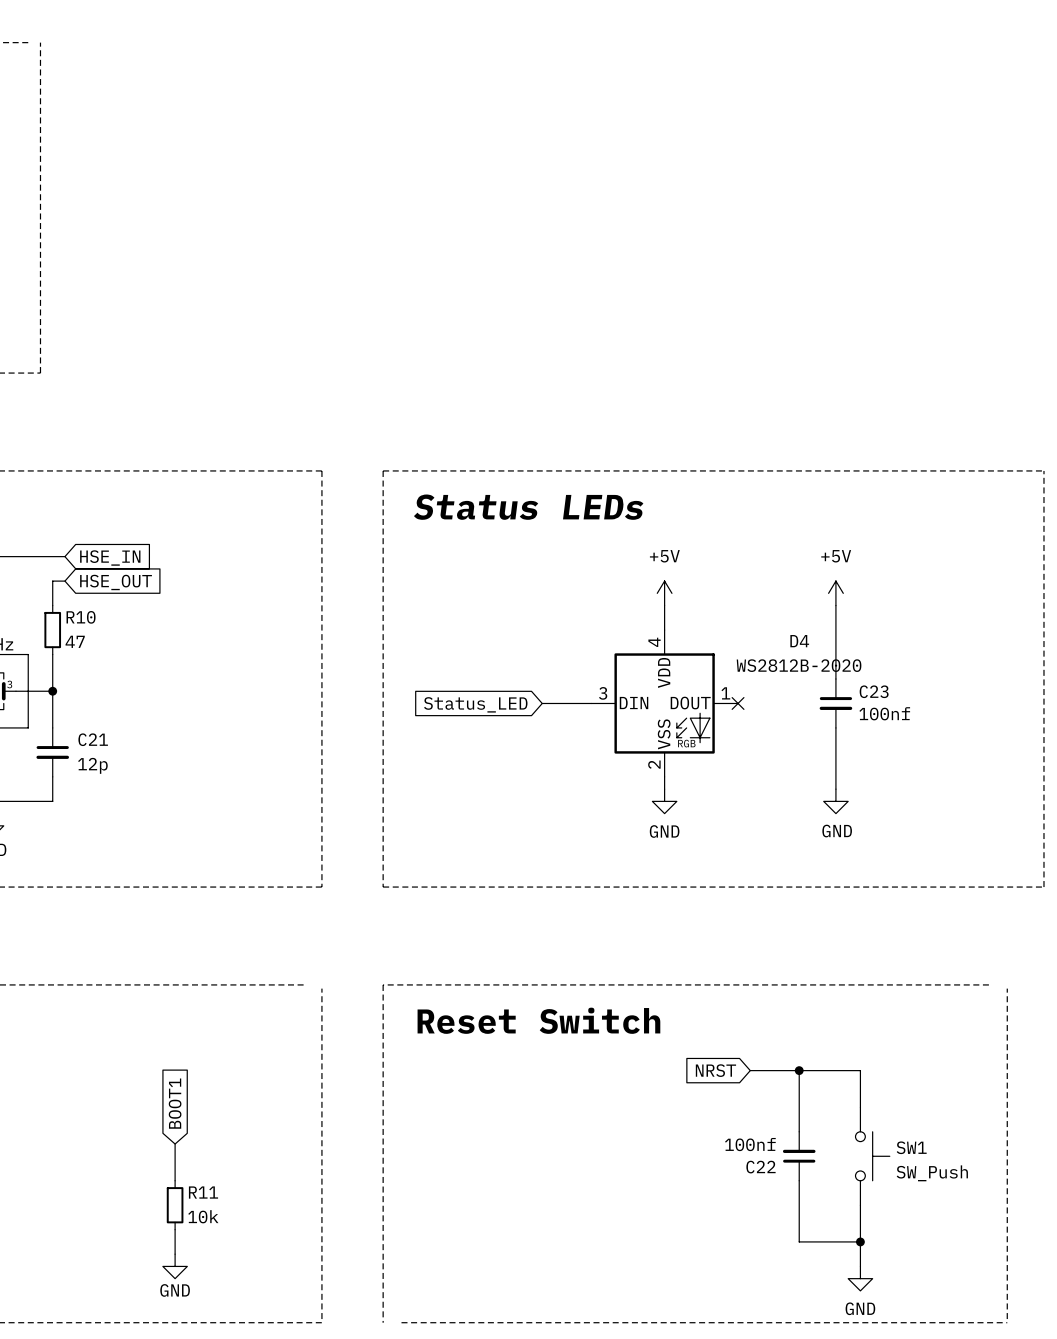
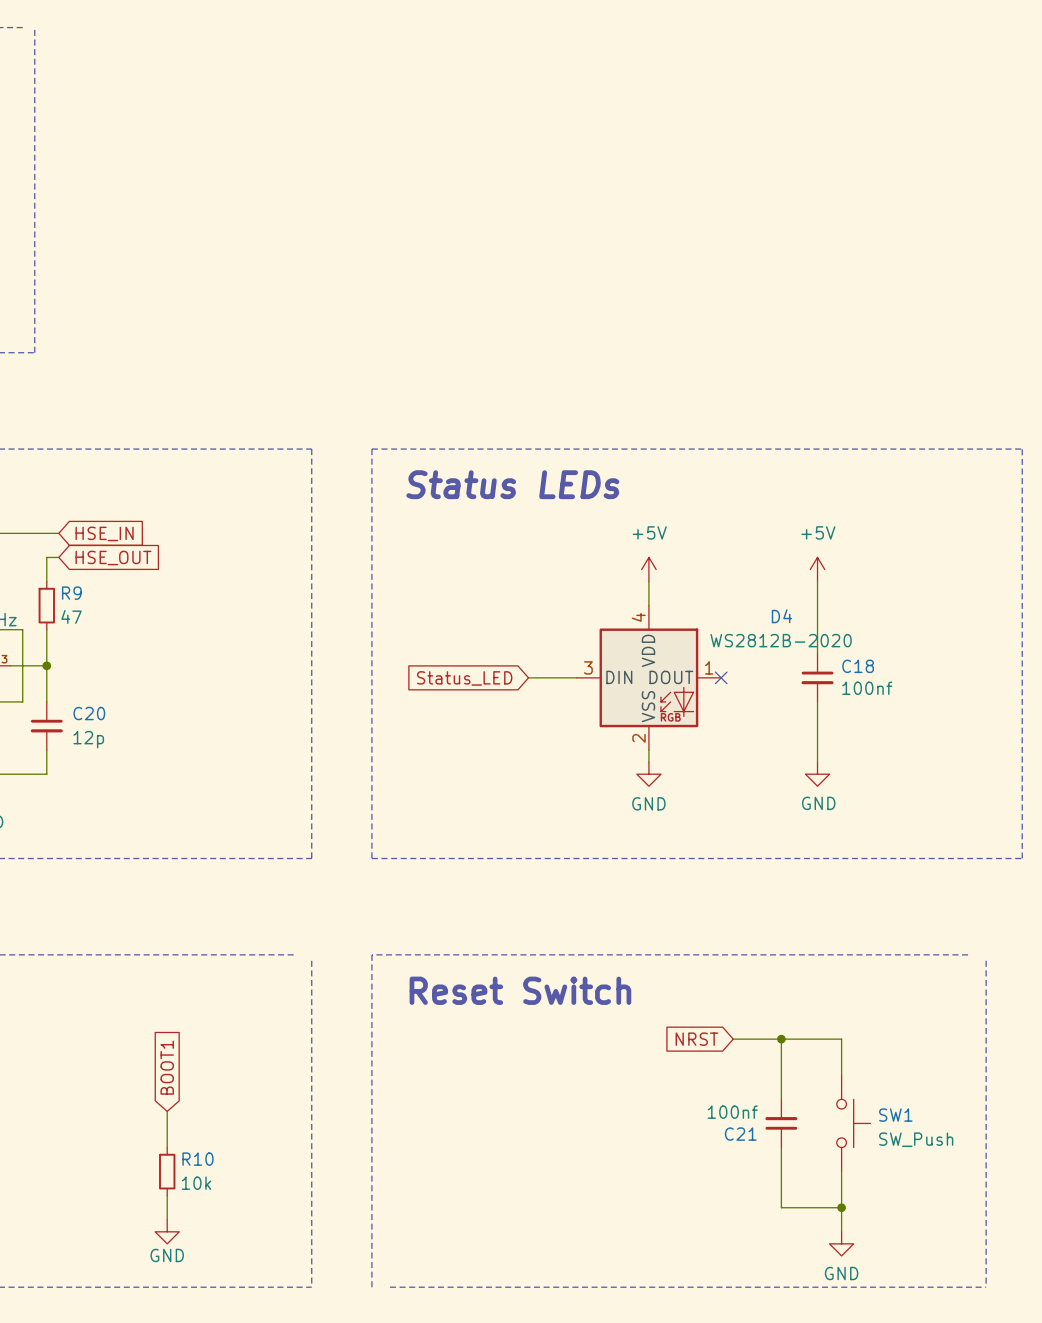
R10 name: R10 (81, 617) -> R9 (71, 593)
C23 name: C23 (874, 691) -> C18 (858, 666)
C21 name: C21 (93, 739) -> C20 (89, 713)
C22 name: C22 (760, 1167) -> C21 (740, 1134)
R11 name: R11 (203, 1192) -> R10 (197, 1159)

